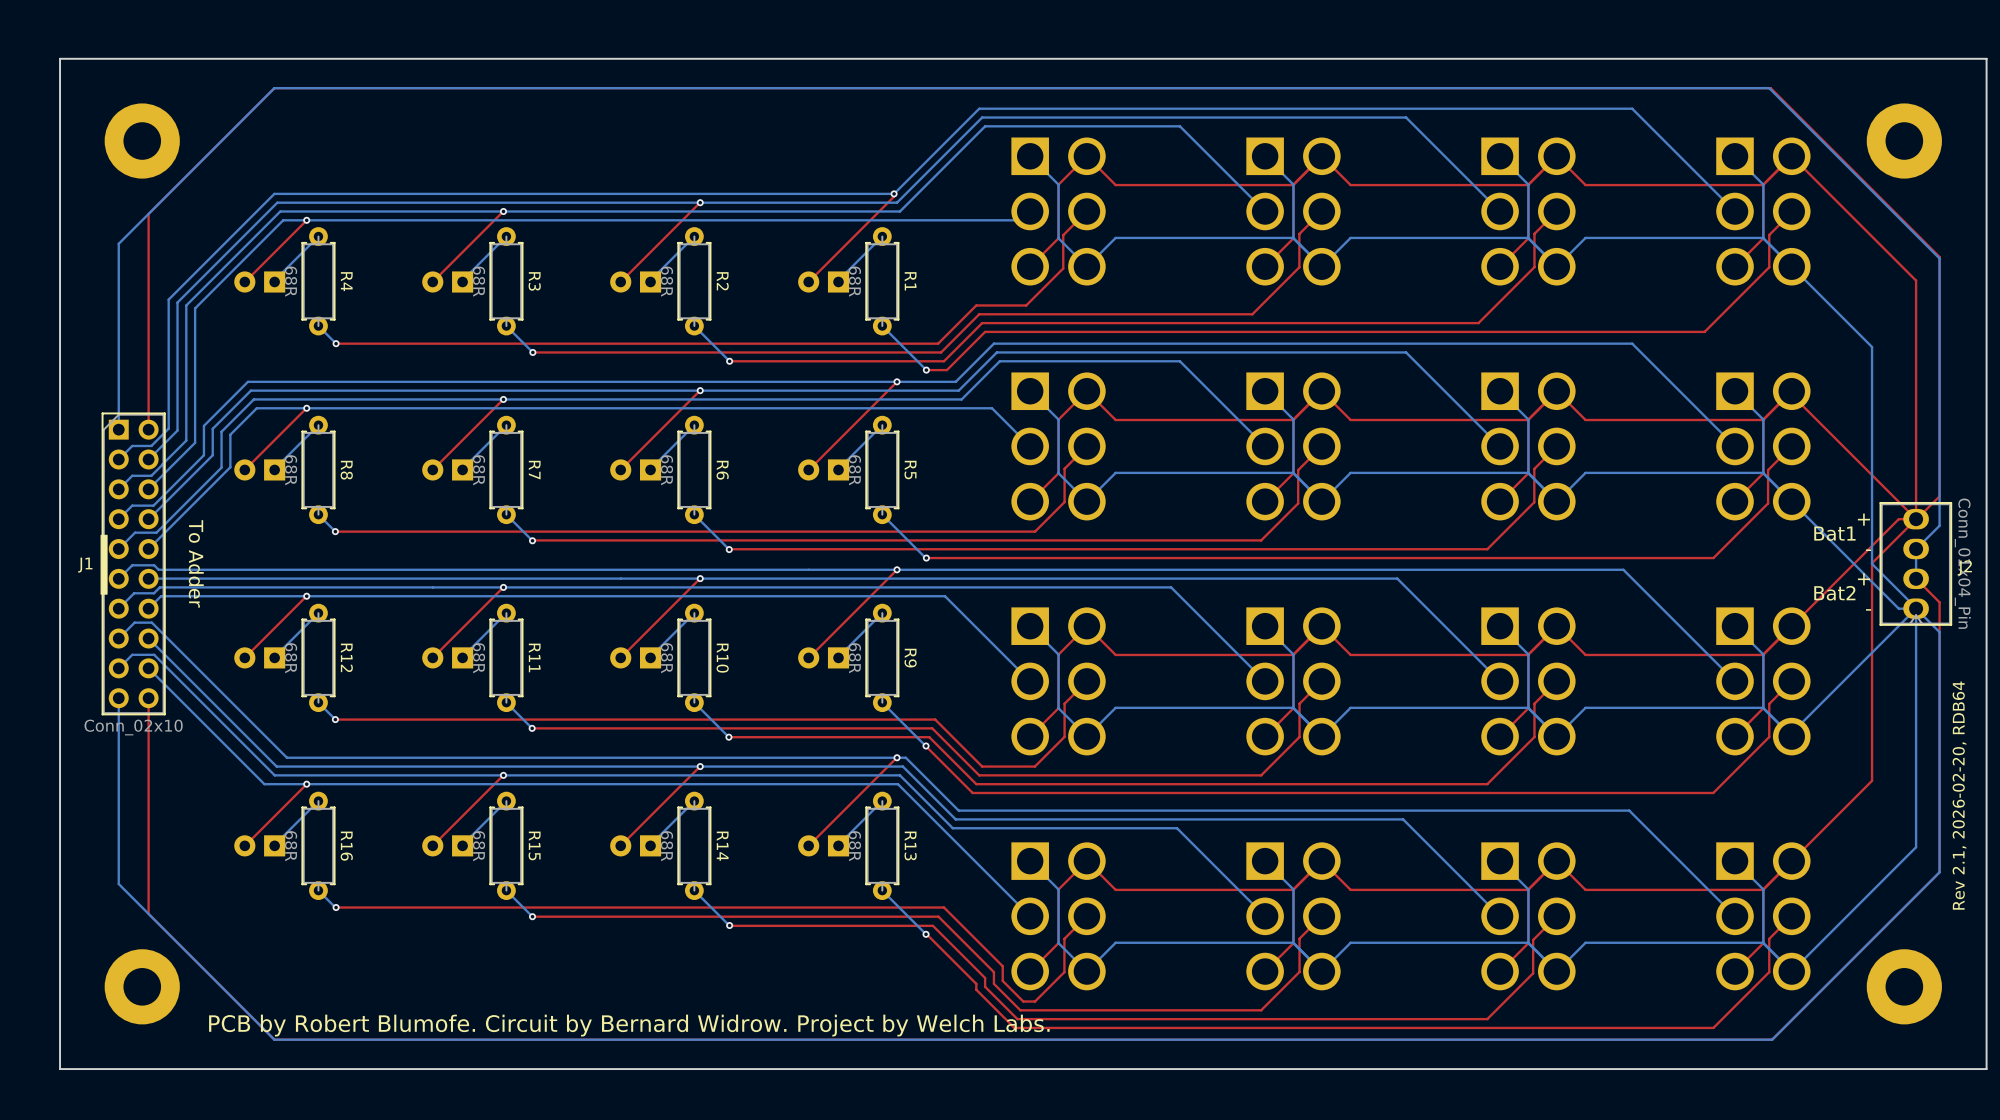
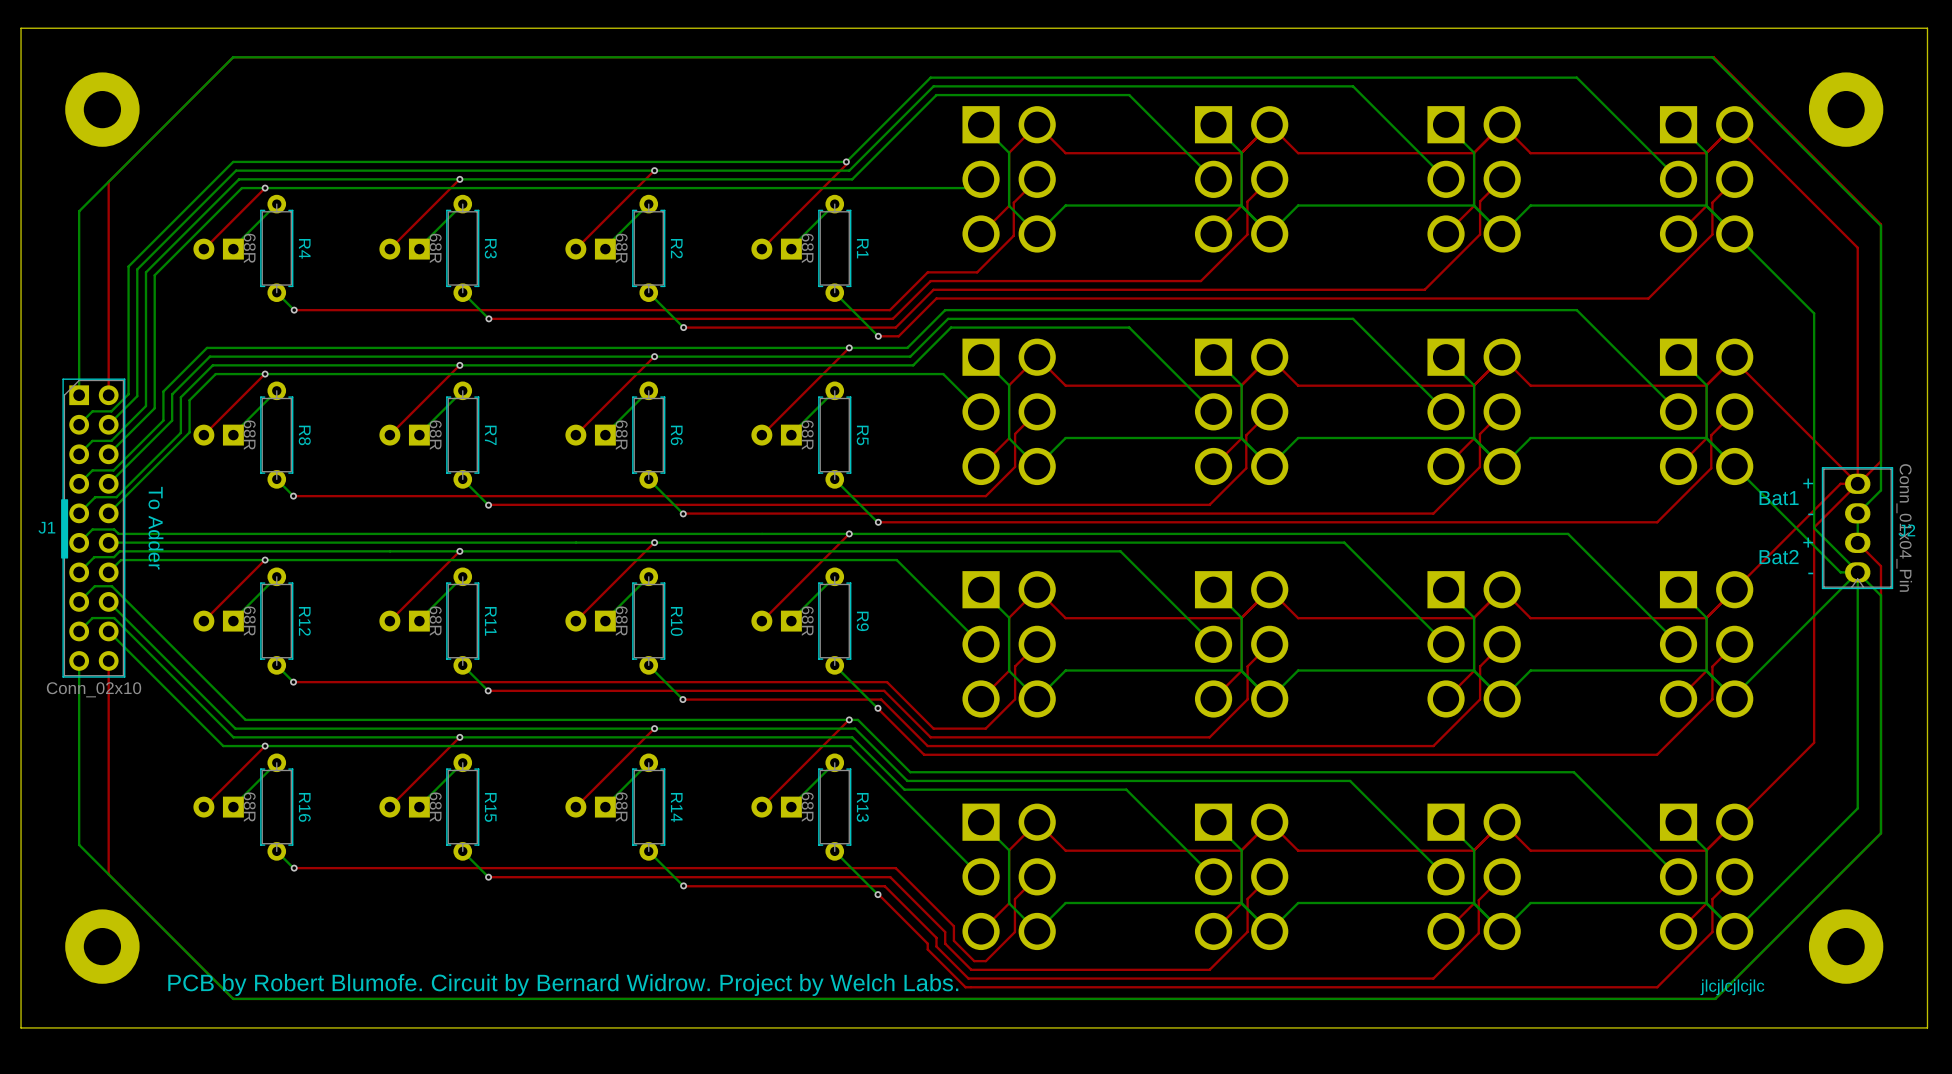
text: Rev 2.1, 2026-02-20, RDB64 (1959, 795) -> none
text: none -> jlcjlcjlcjlc (1732, 987)

